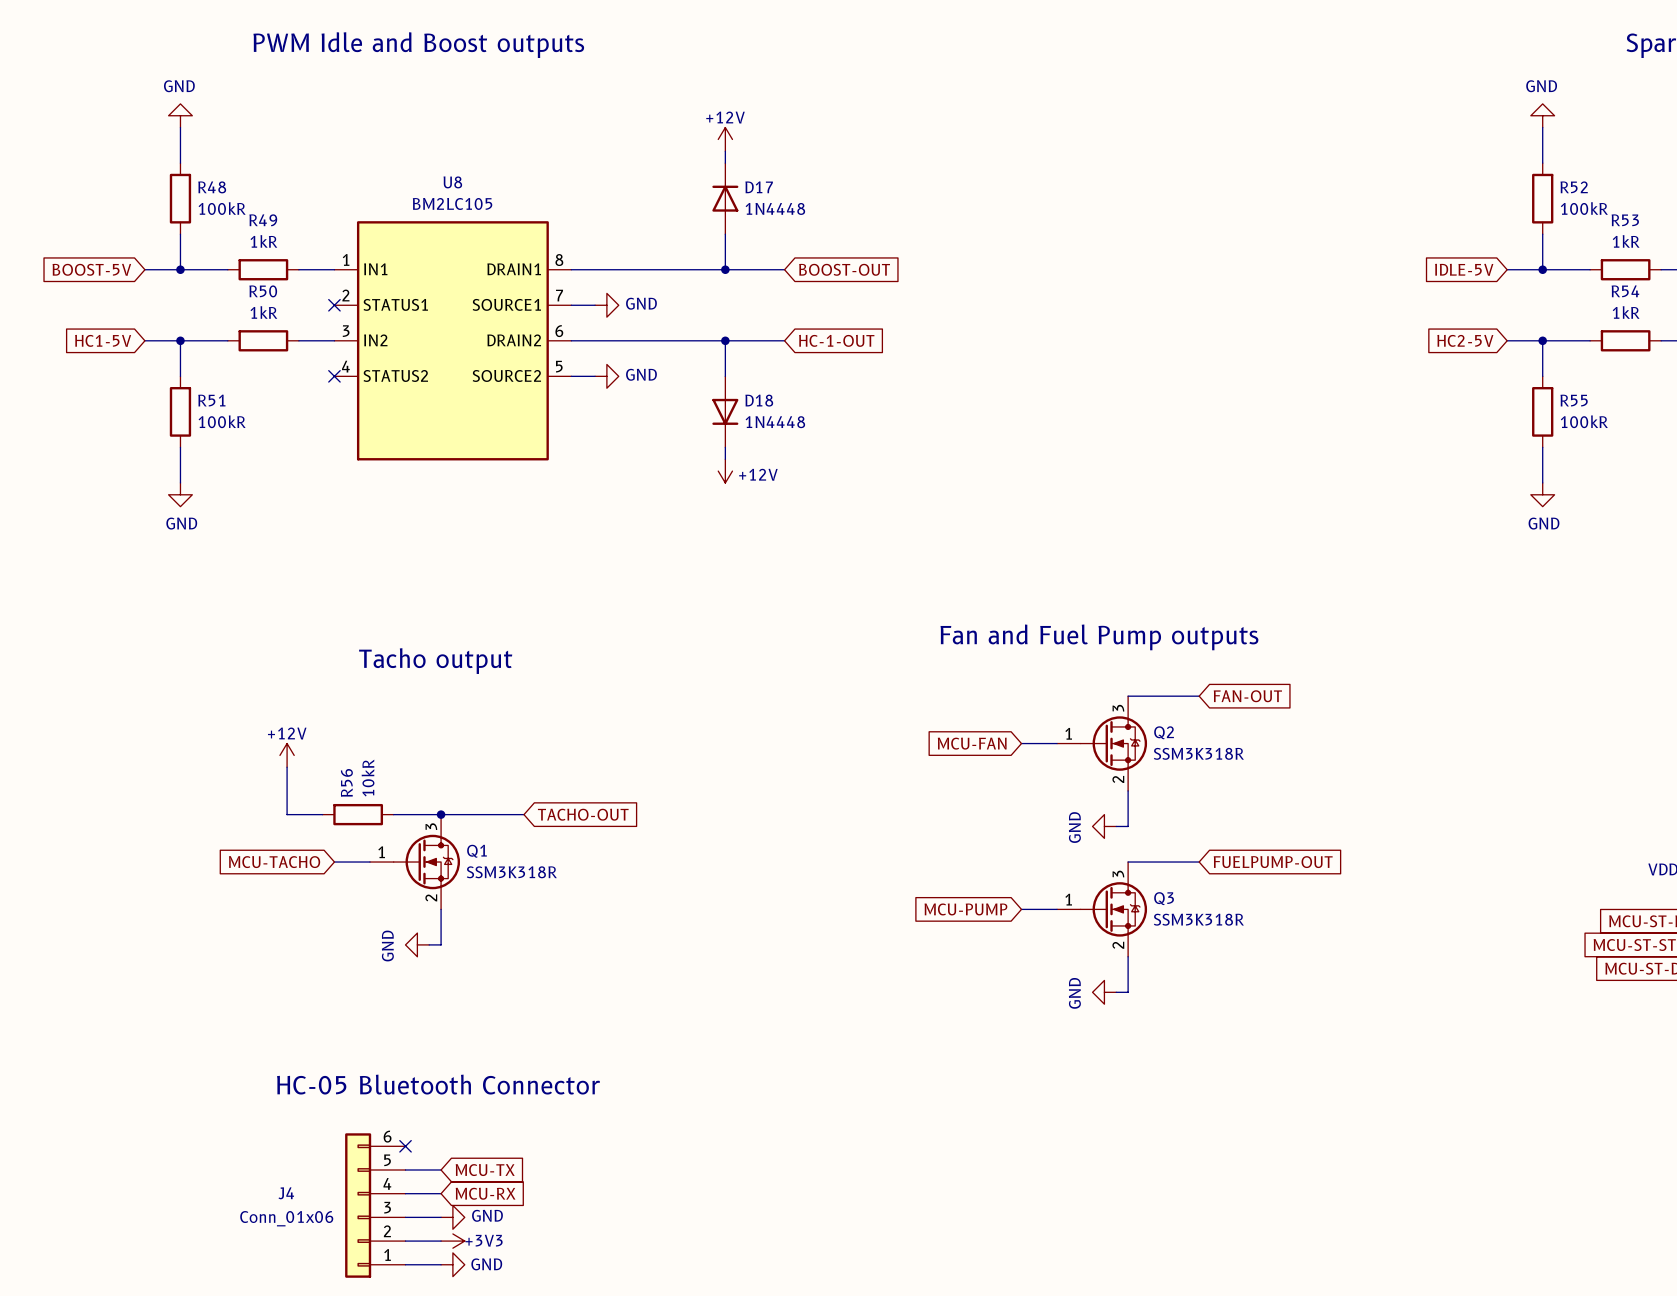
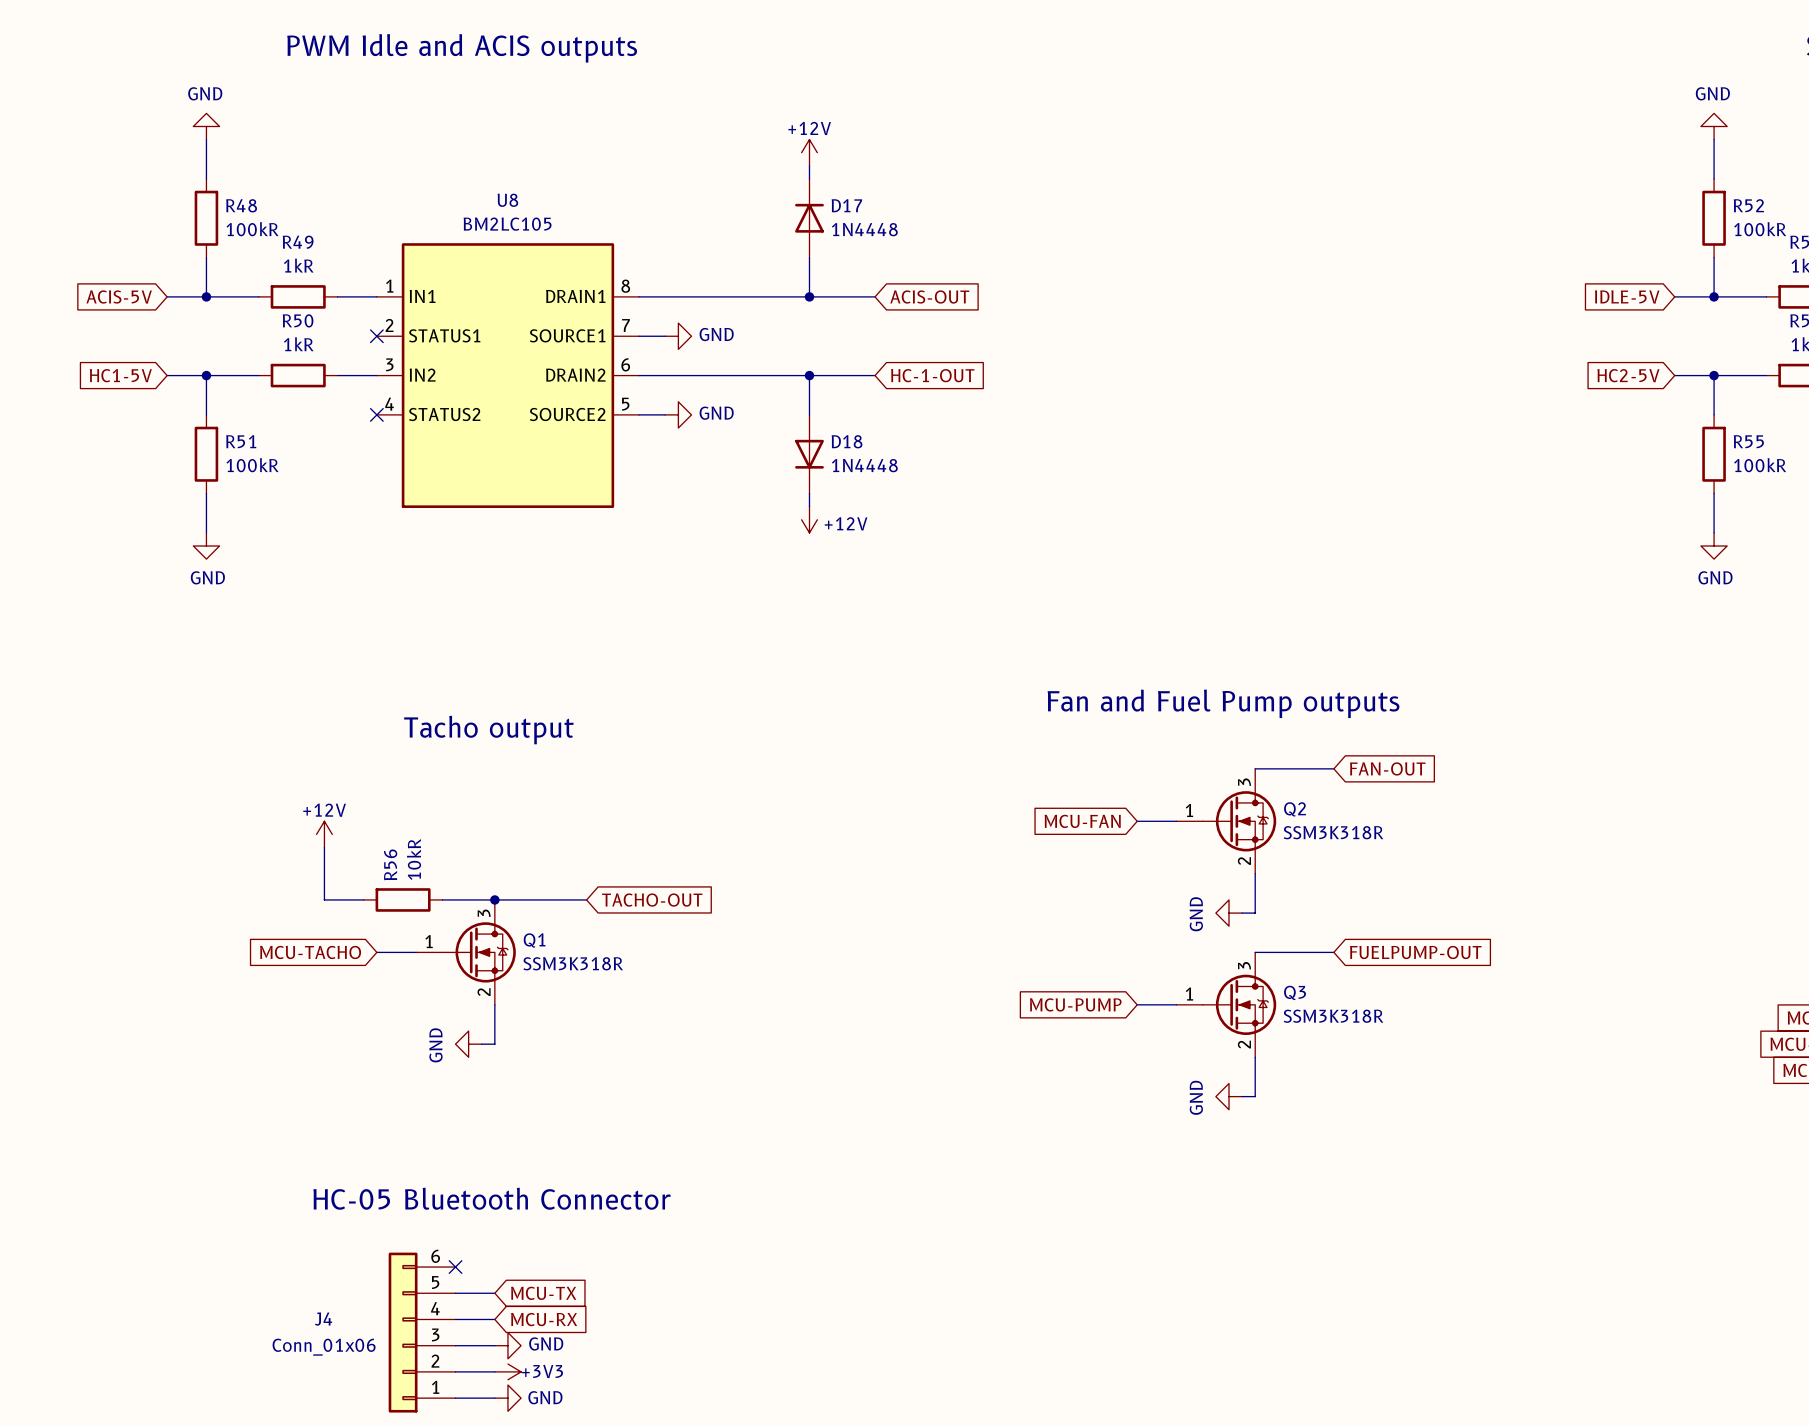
text: PWM Idle and Boost outputs (418, 45) -> PWM Idle and ACIS outputs (462, 48)
global label: BOOST-5V (91, 269) -> ACIS-5V (119, 297)
global label: BOOST-OUT (844, 269) -> ACIS-OUT (929, 296)

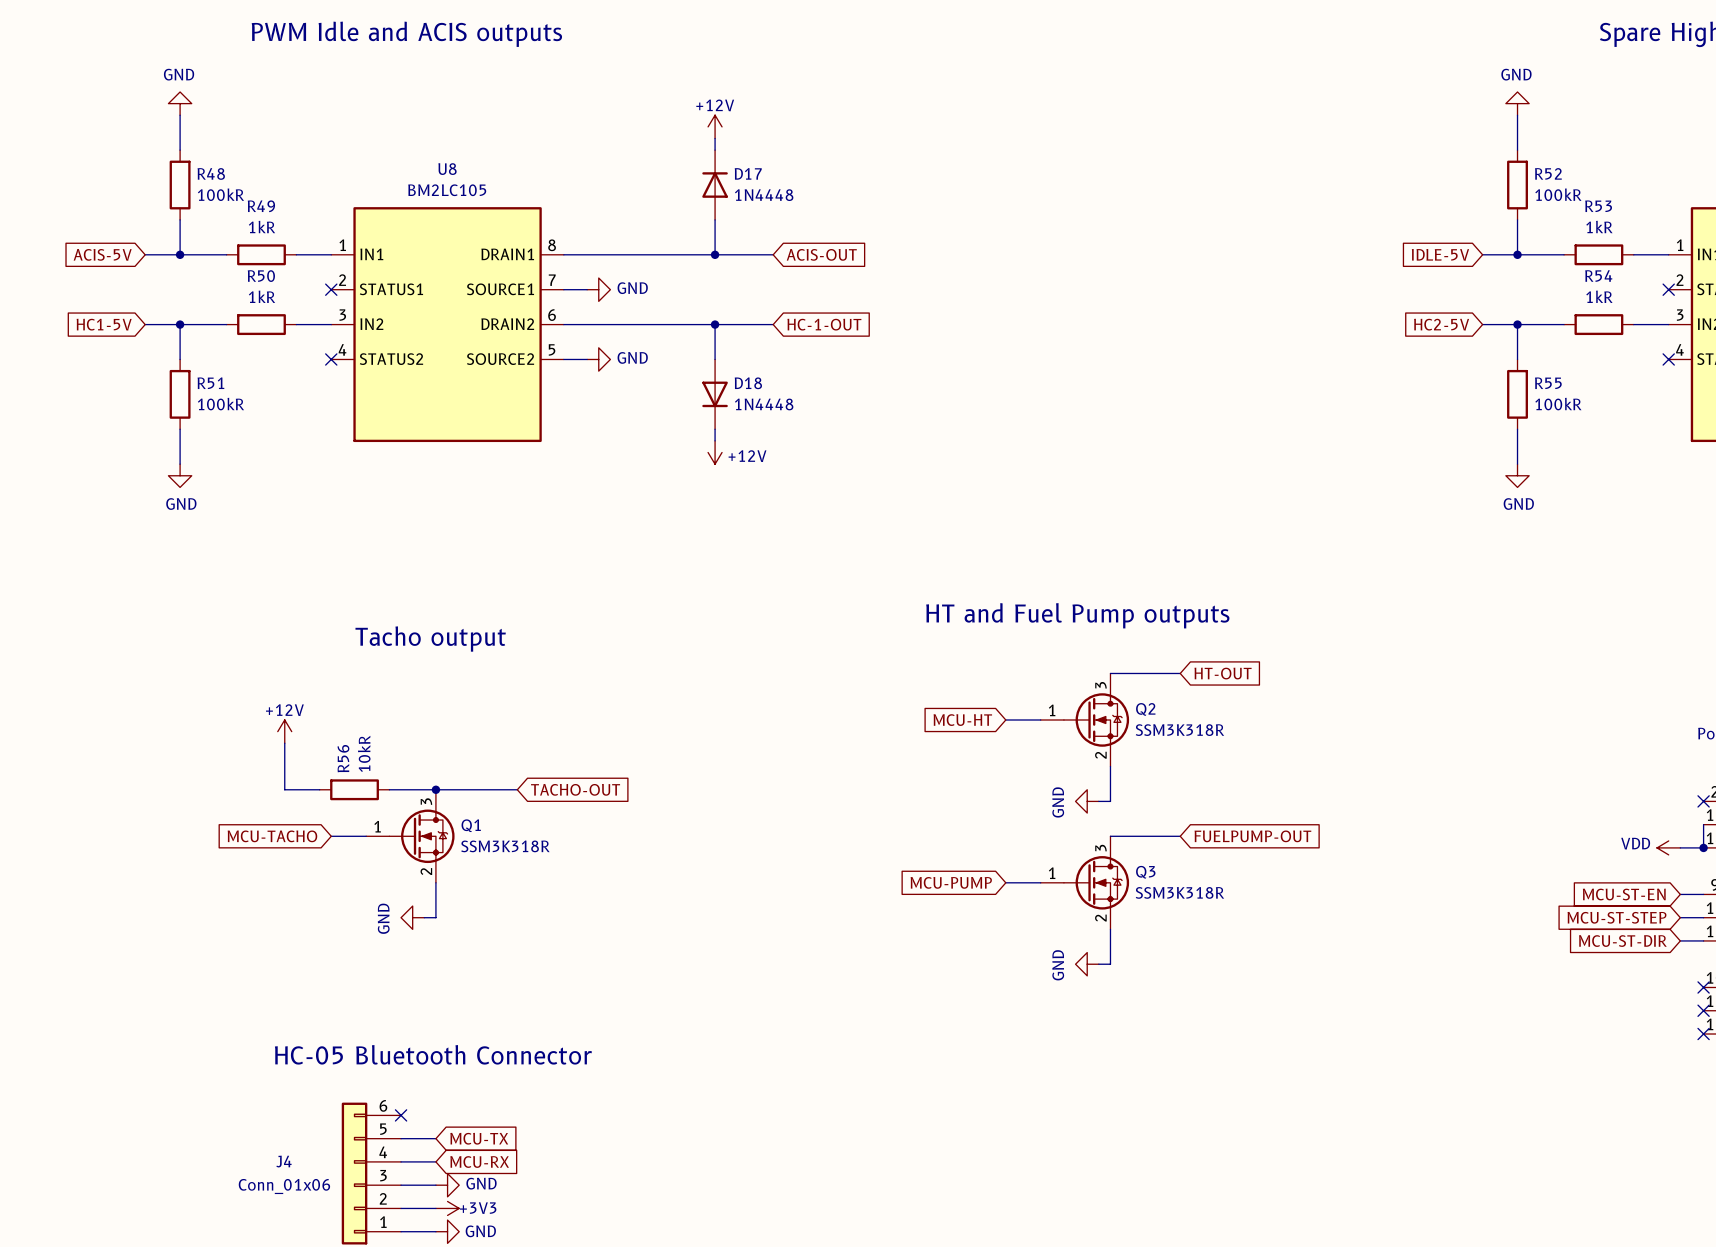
text: Fan and Fuel Pump outputs (1223, 703) -> HT and Fuel Pump outputs (1077, 615)
global label: FAN-OUT (1387, 768) -> HT-OUT (1223, 673)
global label: MCU-FAN (1082, 821) -> MCU-HT (962, 720)

